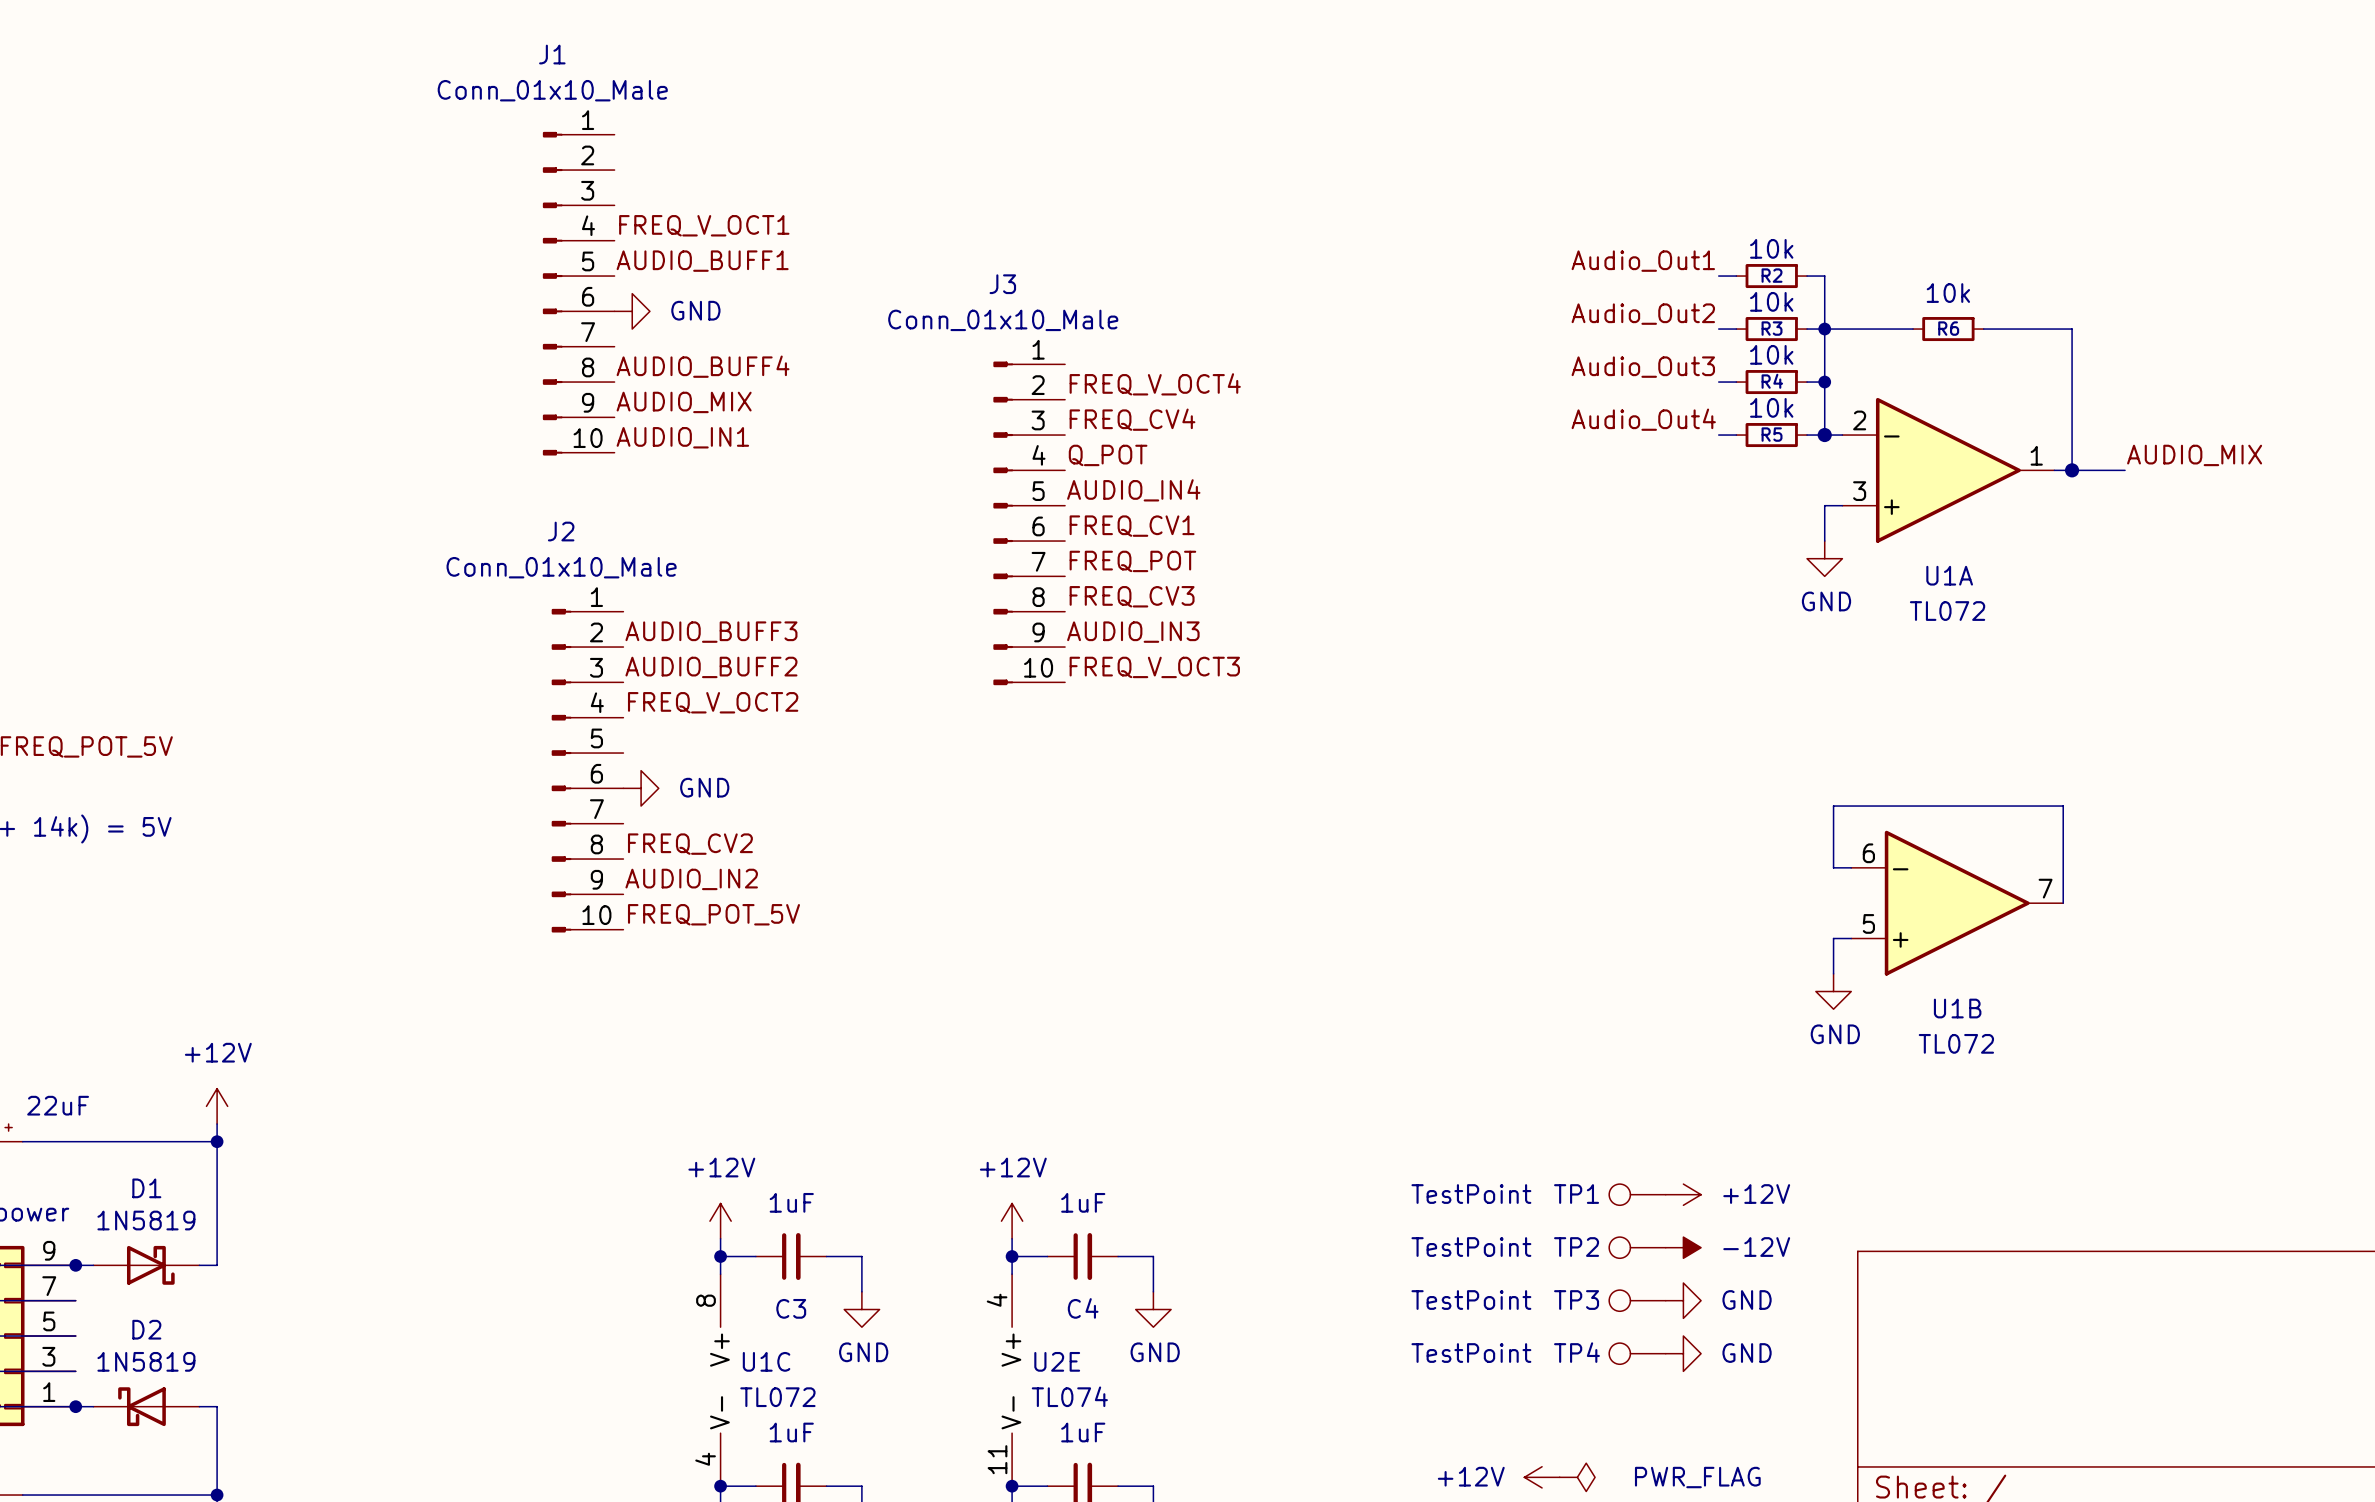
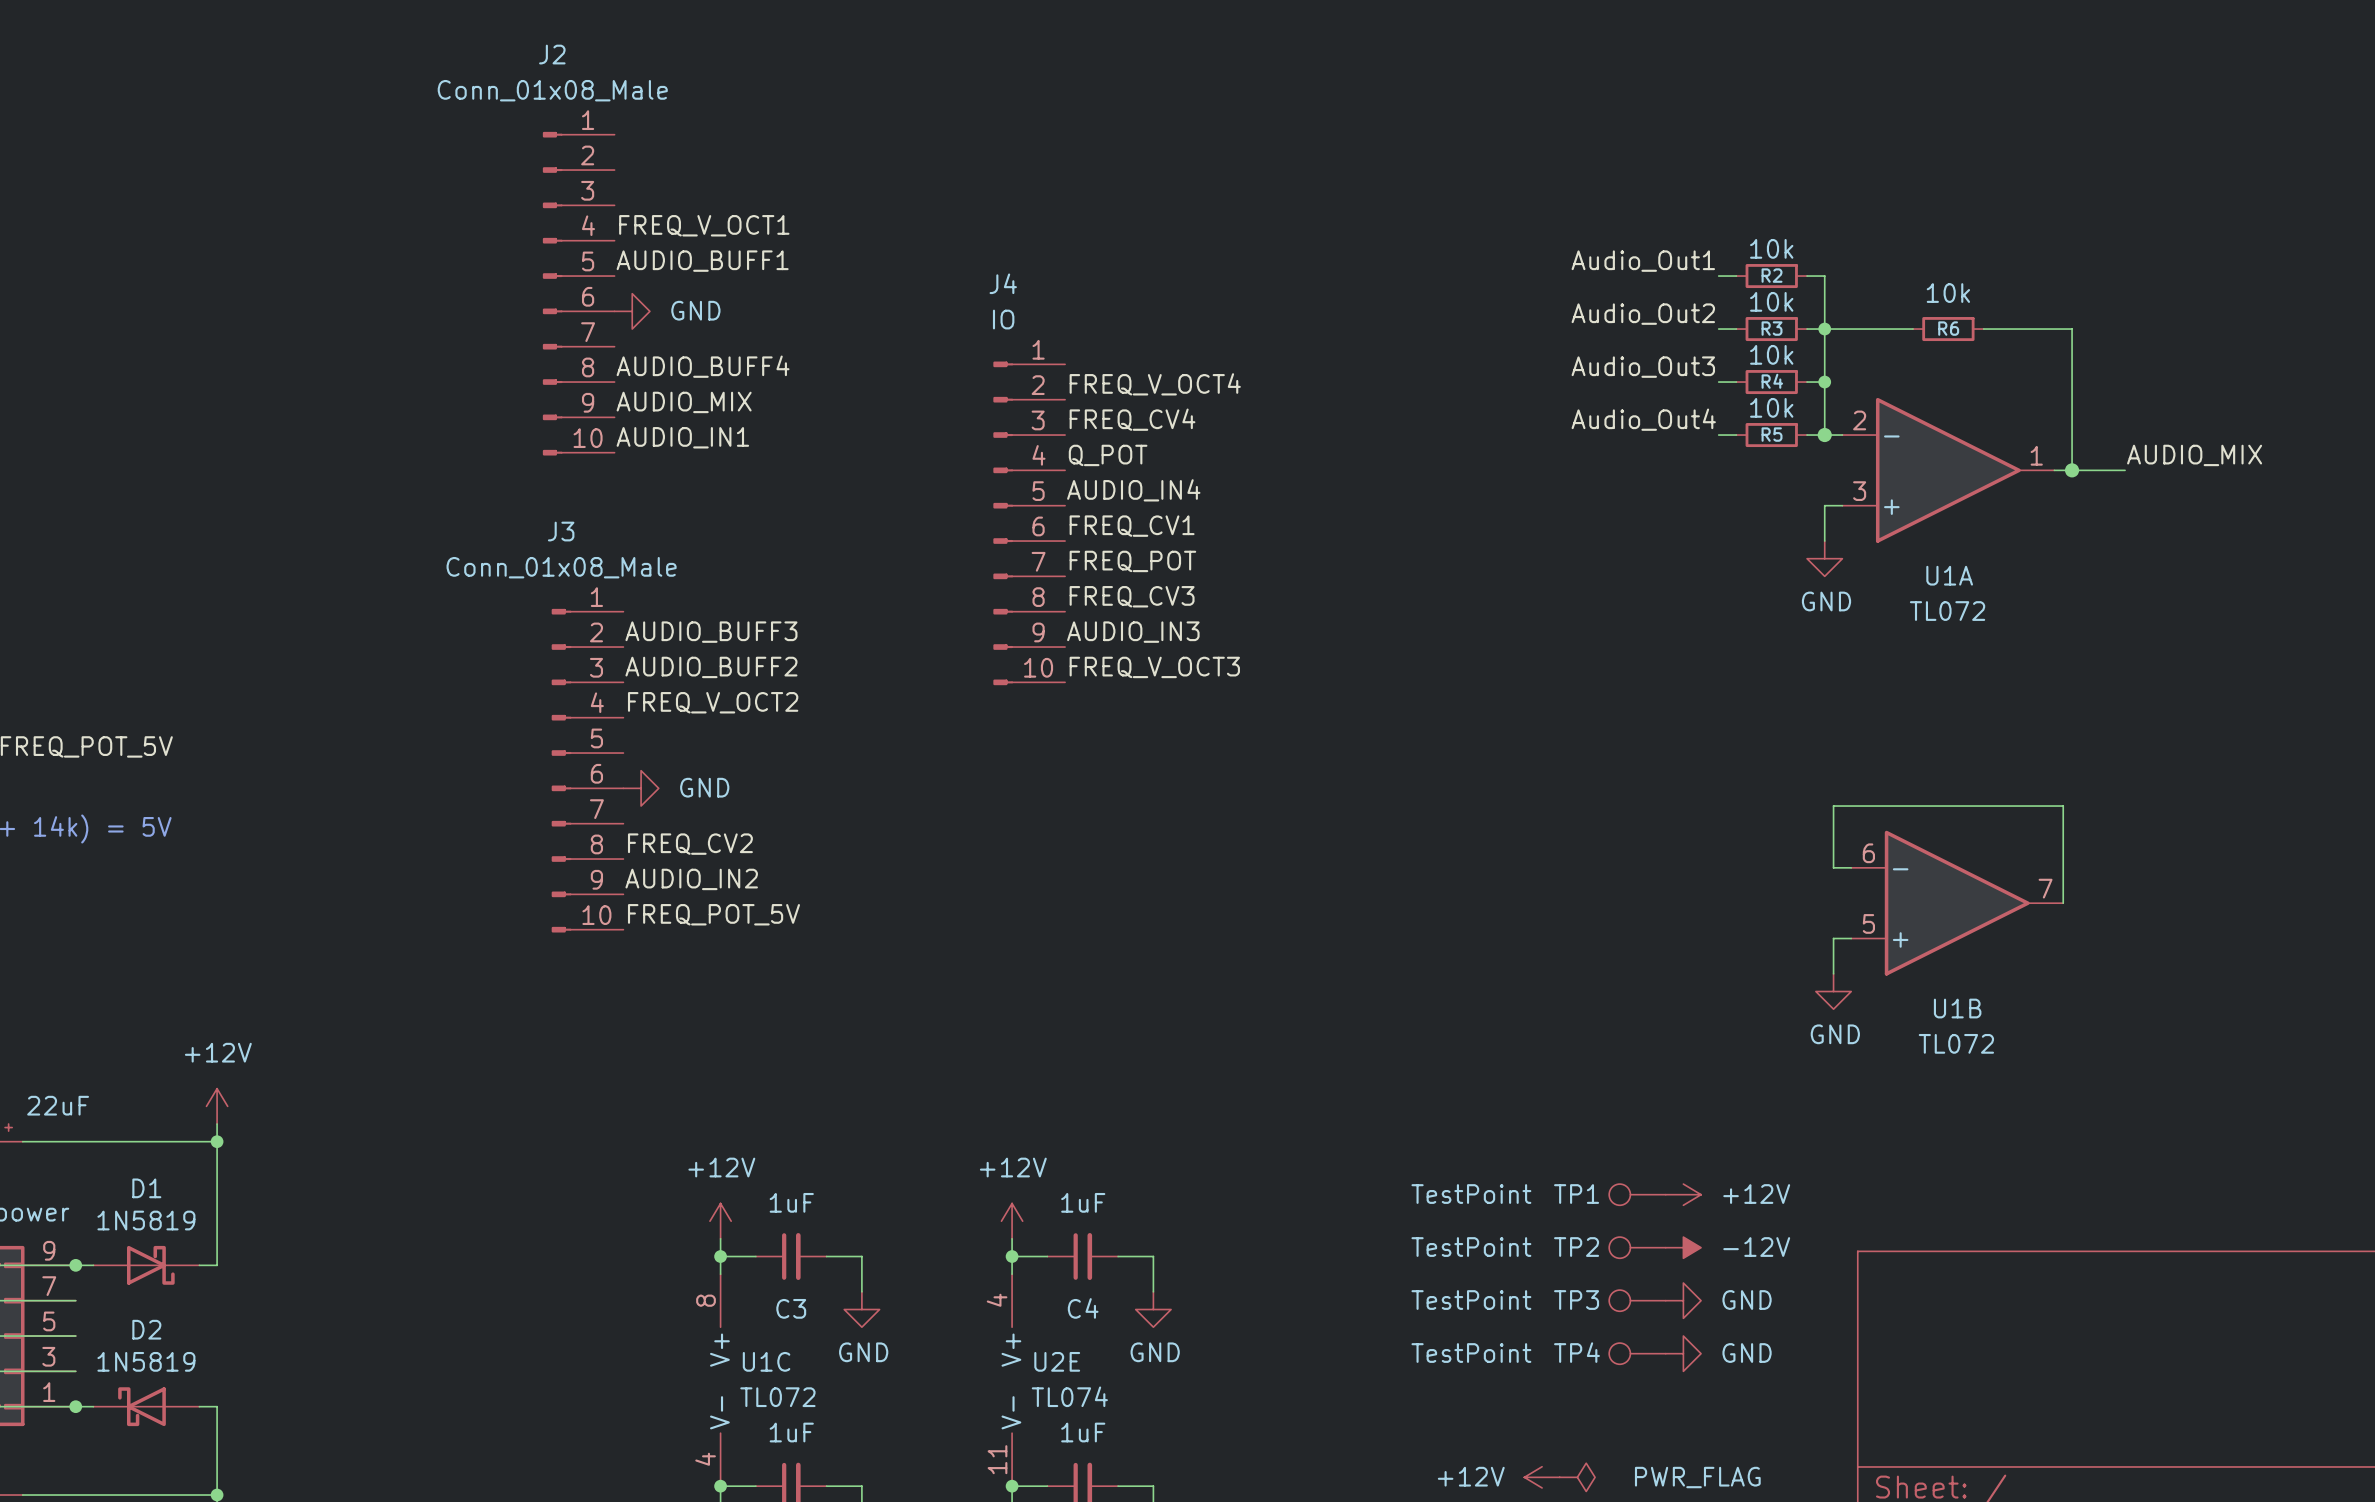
J1 name: J1 (552, 54) -> J2 (552, 54)
J1 value: Conn_01x10_Male (552, 90) -> Conn_01x08_Male (552, 90)
J3 name: J3 (1002, 284) -> J4 (1003, 283)
J3 value: Conn_01x10_Male (1003, 320) -> IO (1003, 319)
J2 name: J2 (561, 531) -> J3 (561, 531)
J2 value: Conn_01x10_Male (561, 567) -> Conn_01x08_Male (561, 567)

